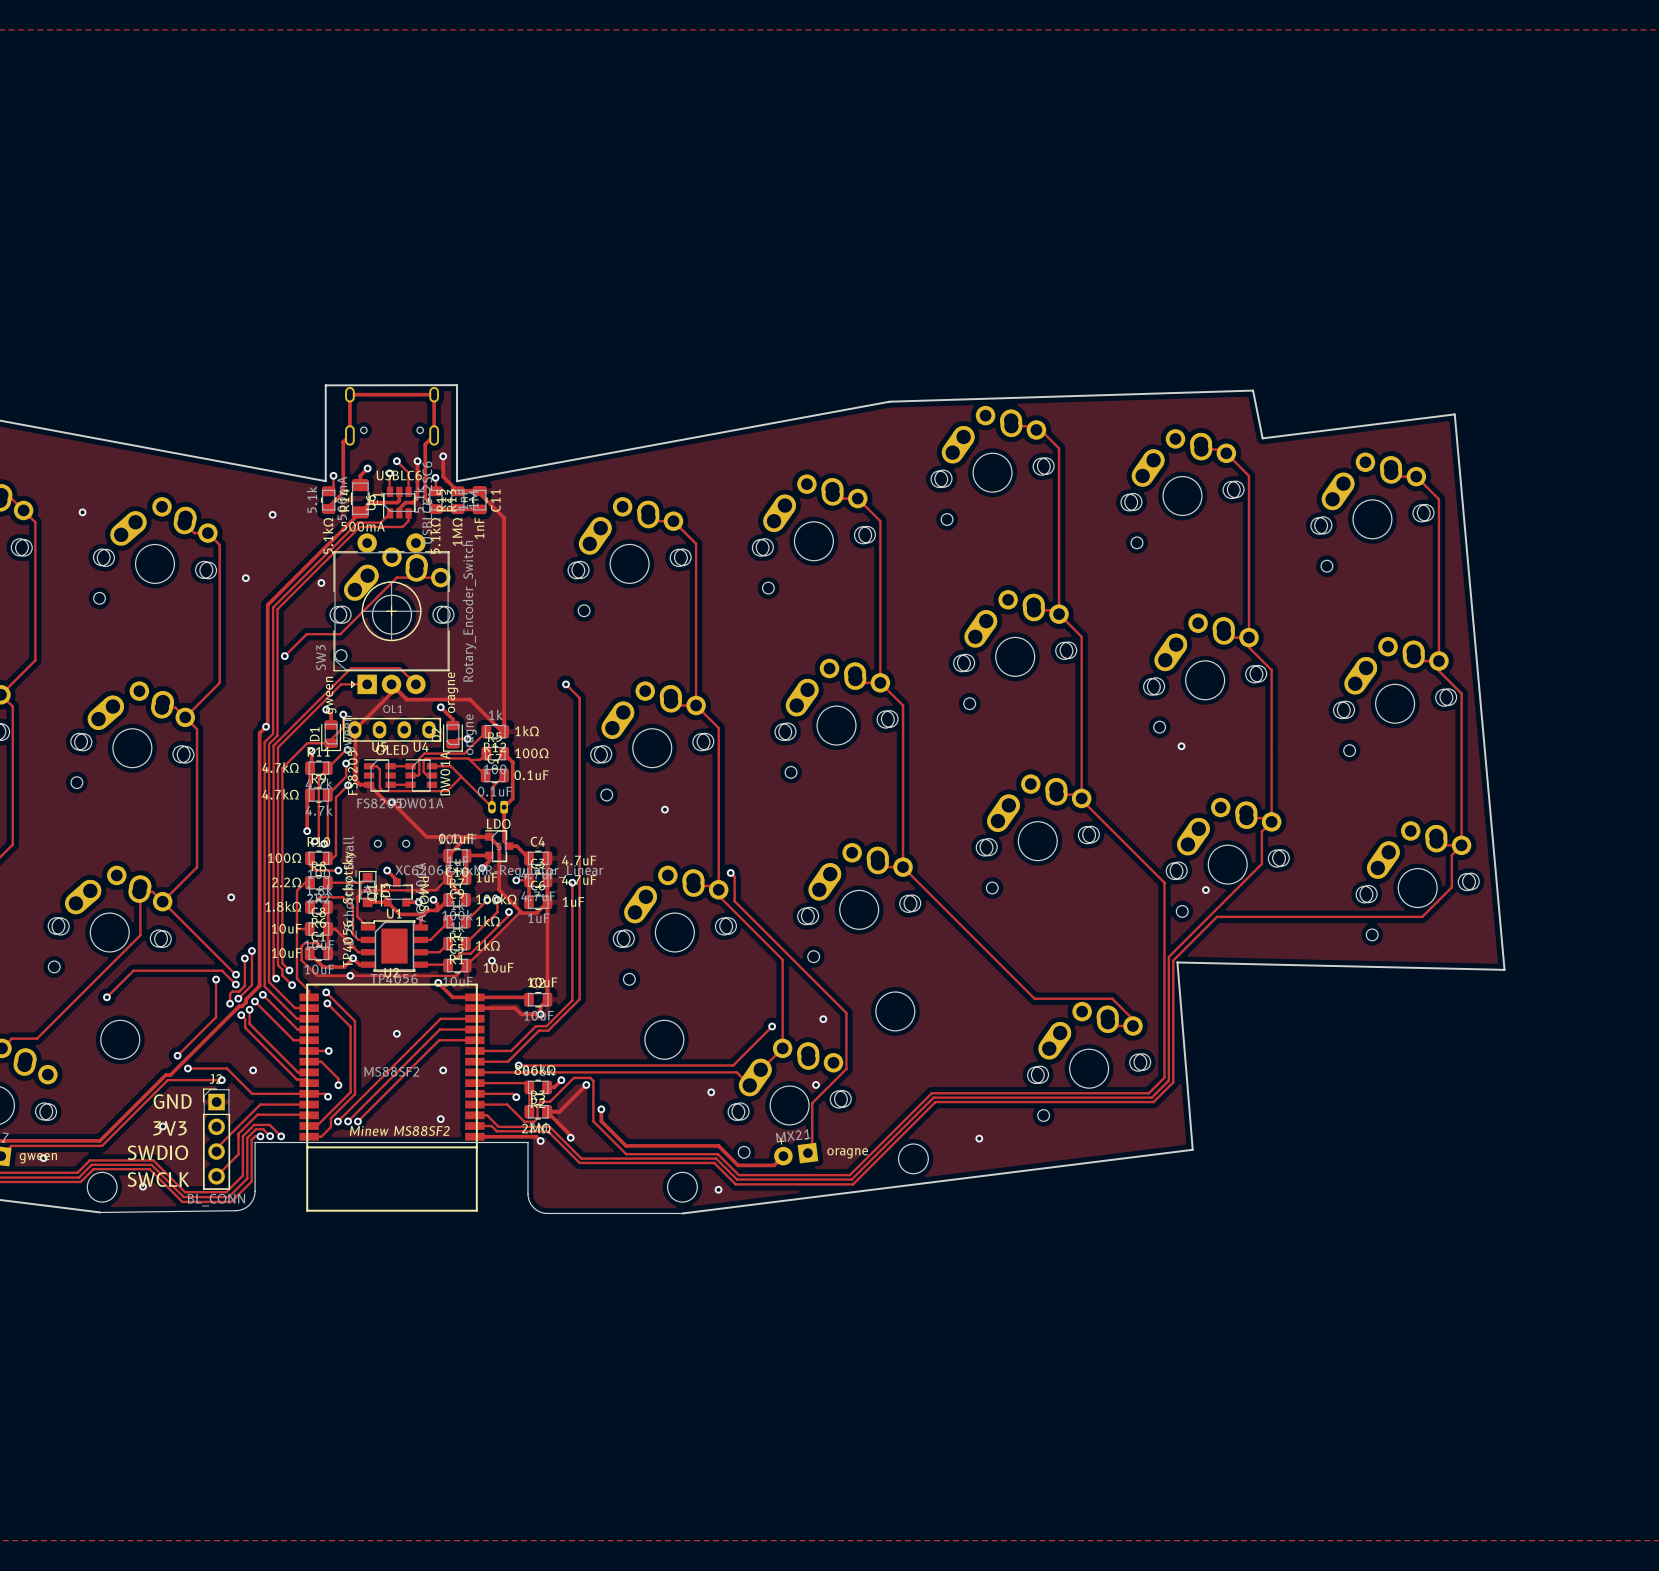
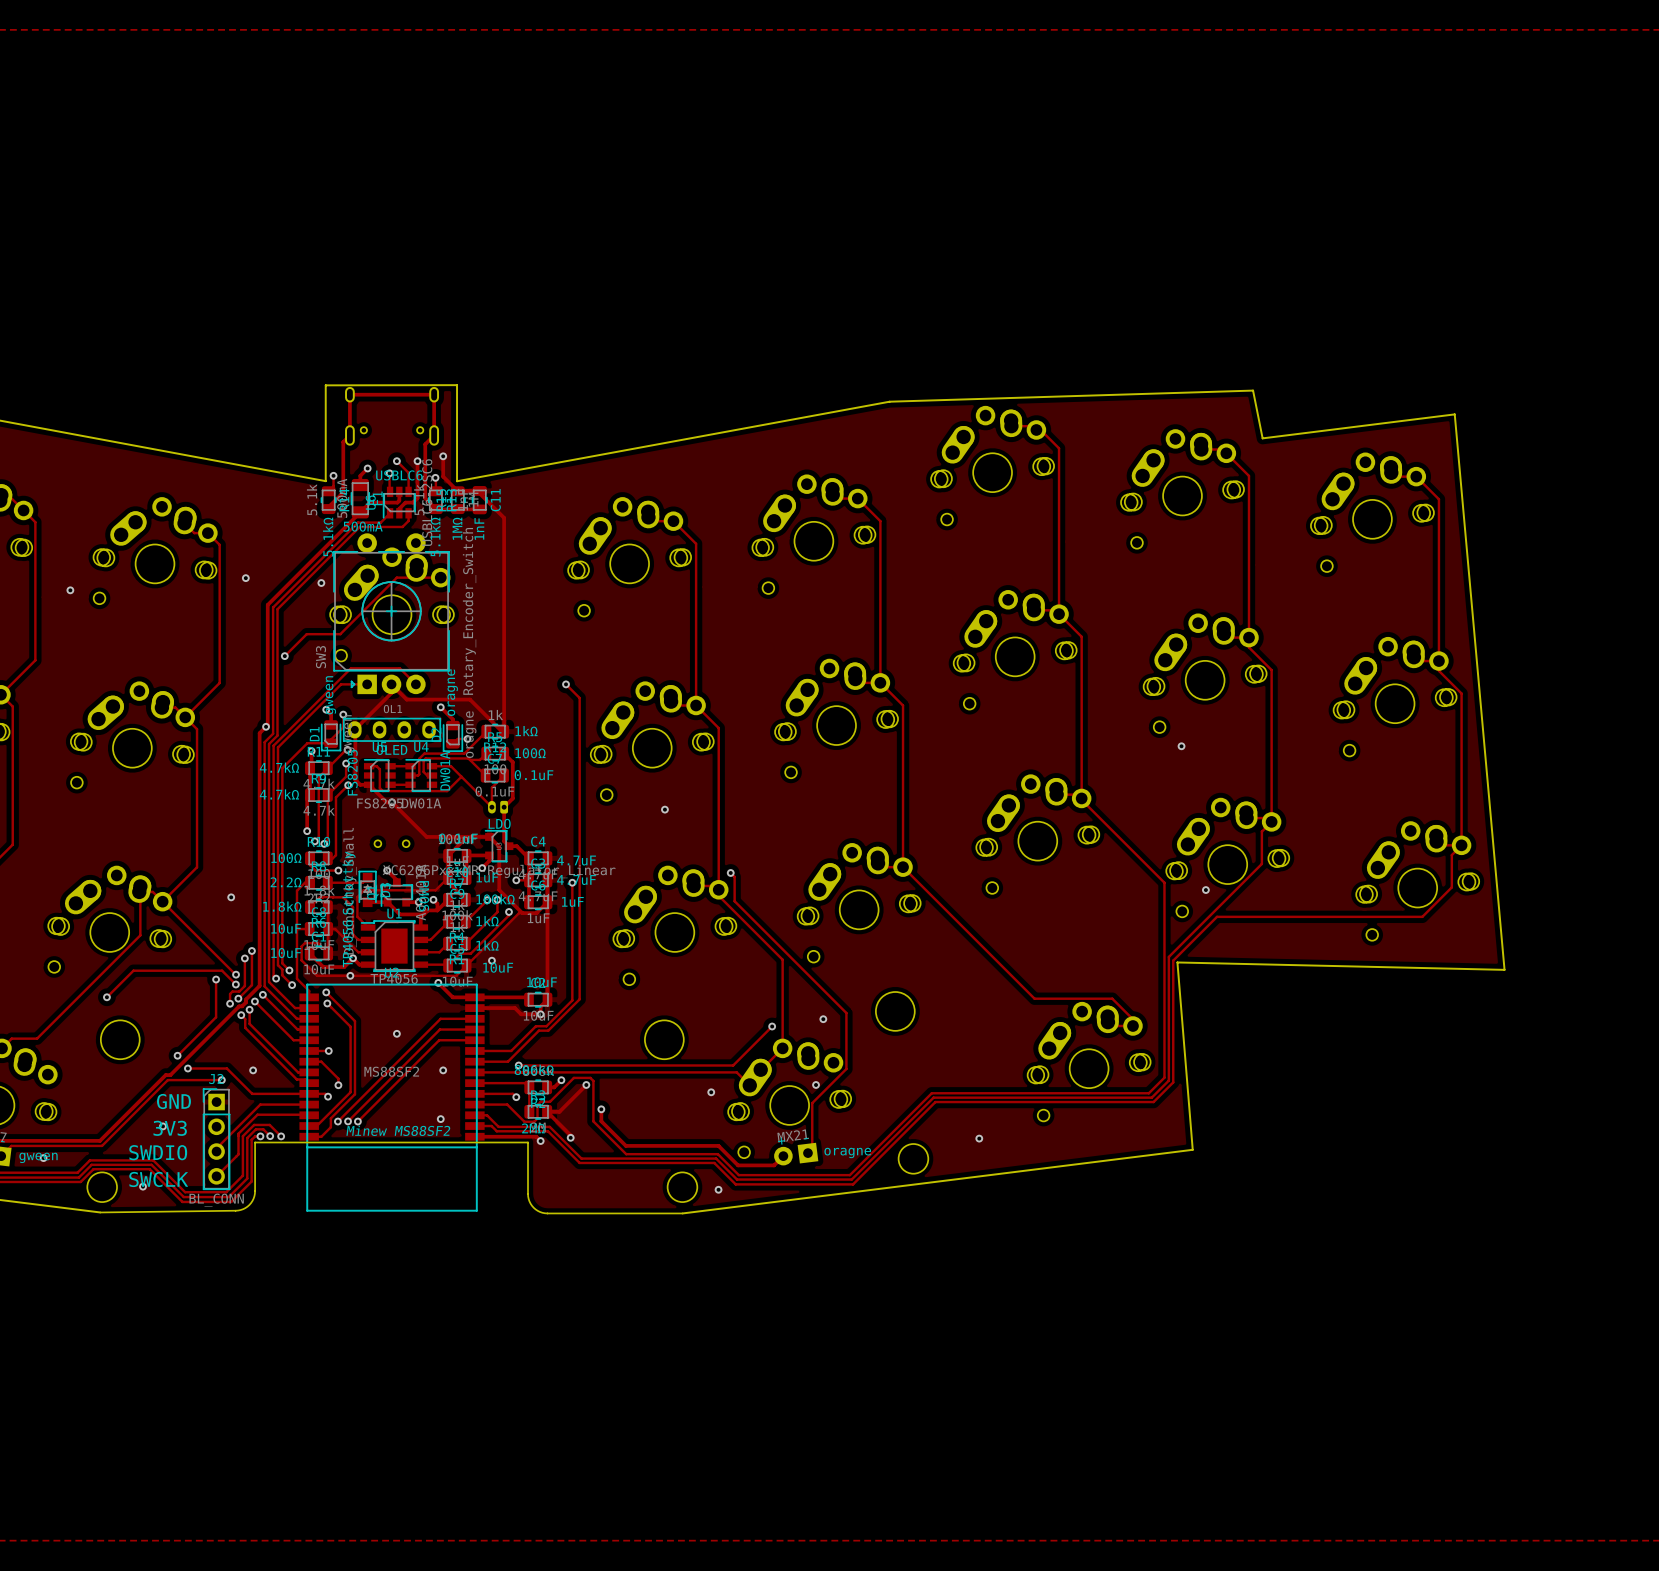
via: (82, 512) -> none
via: (272, 514) -> none
via: none -> (70, 590)

